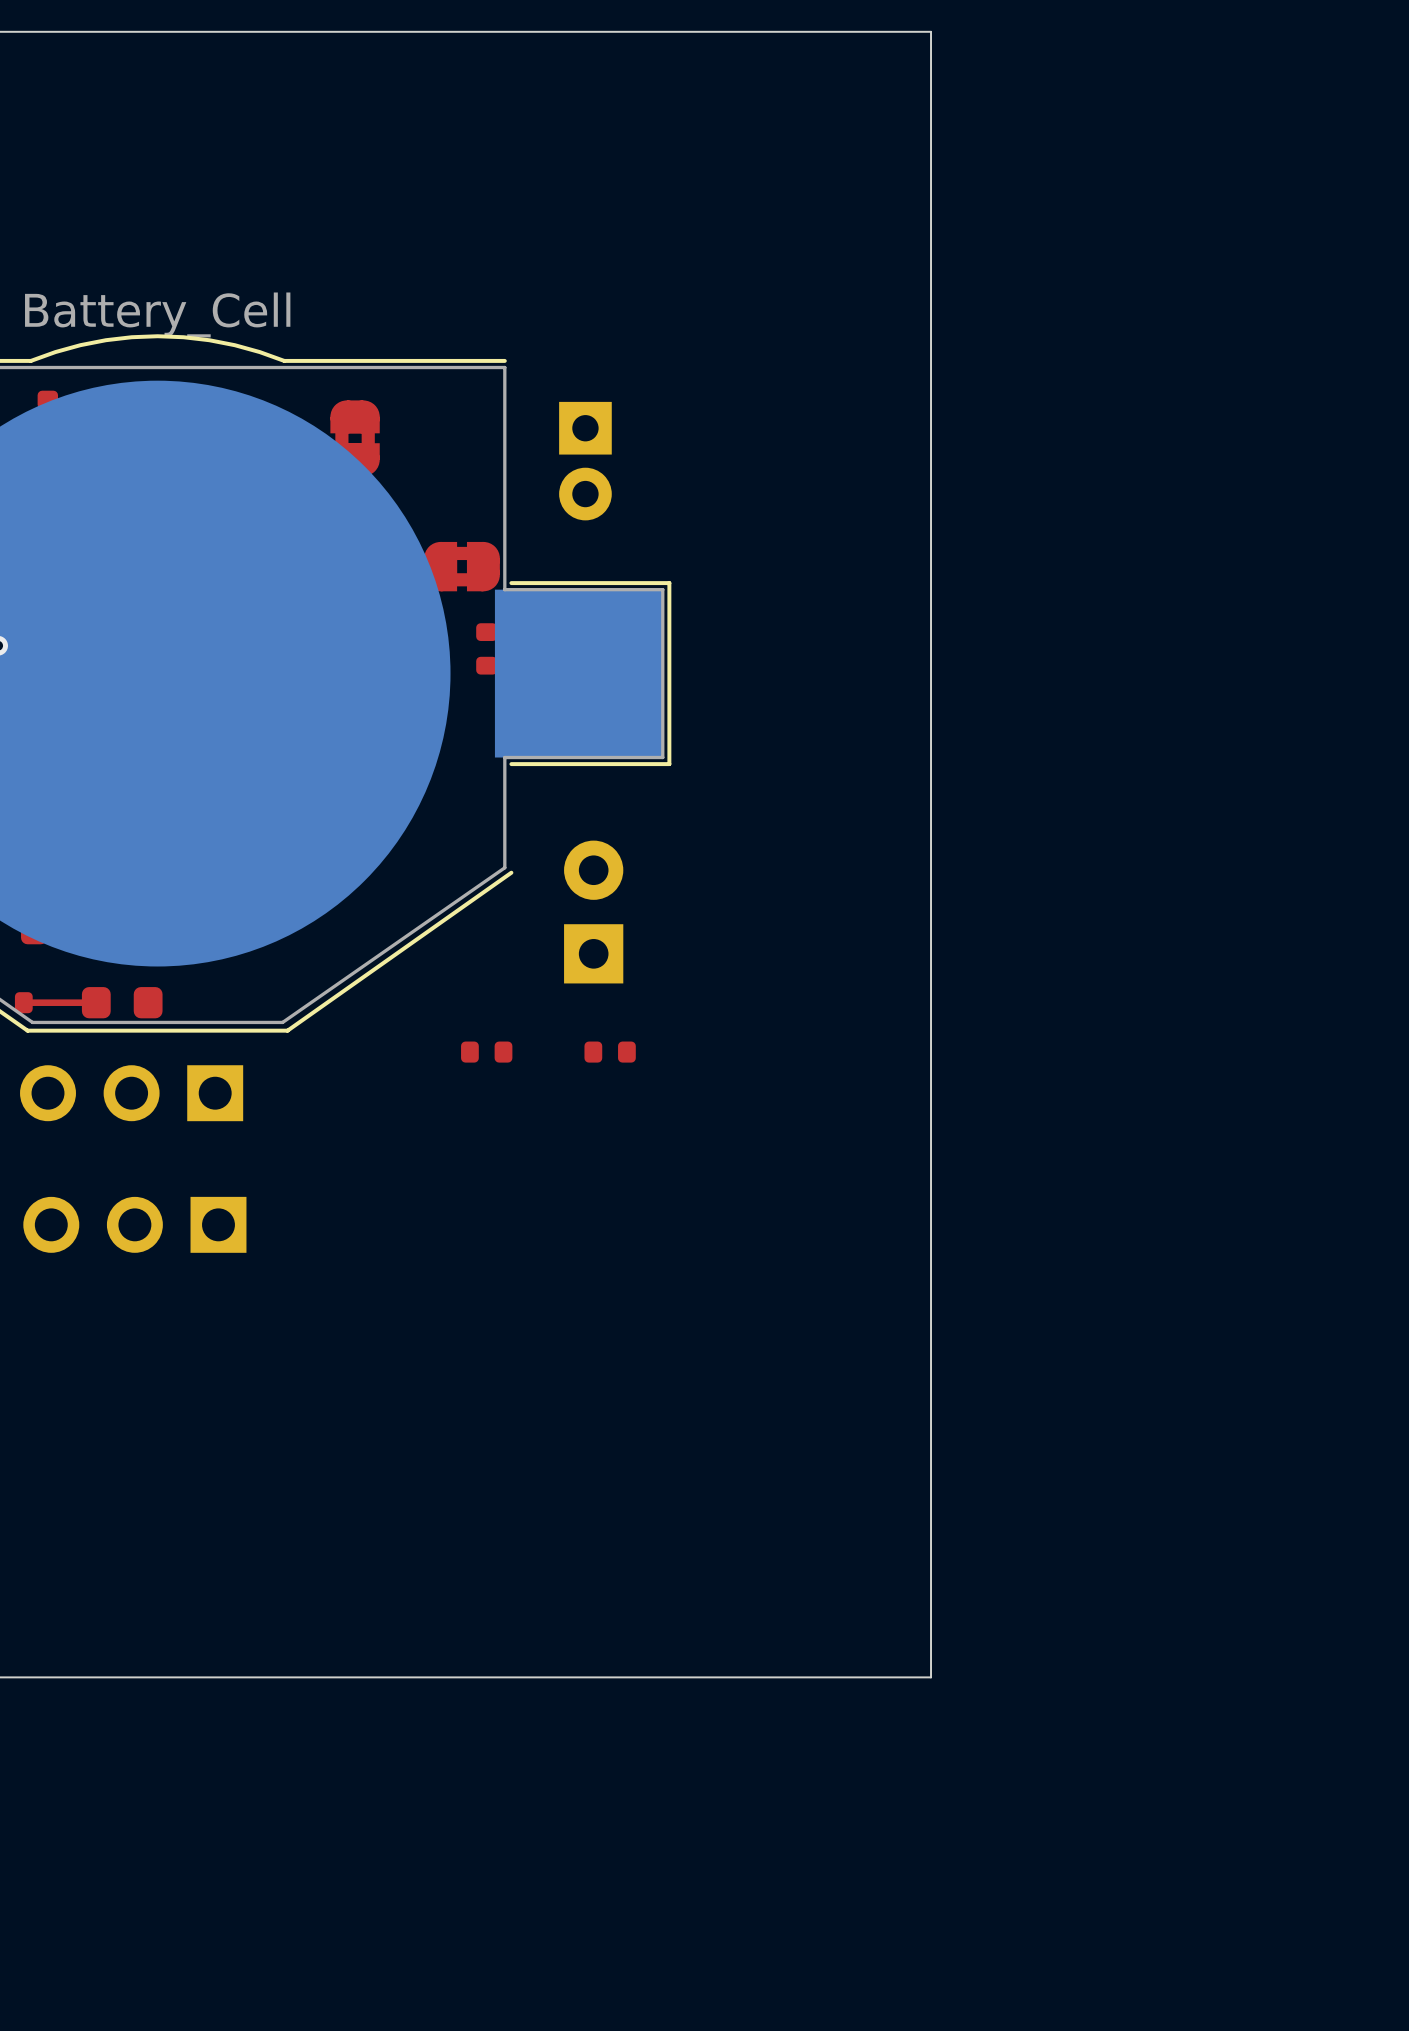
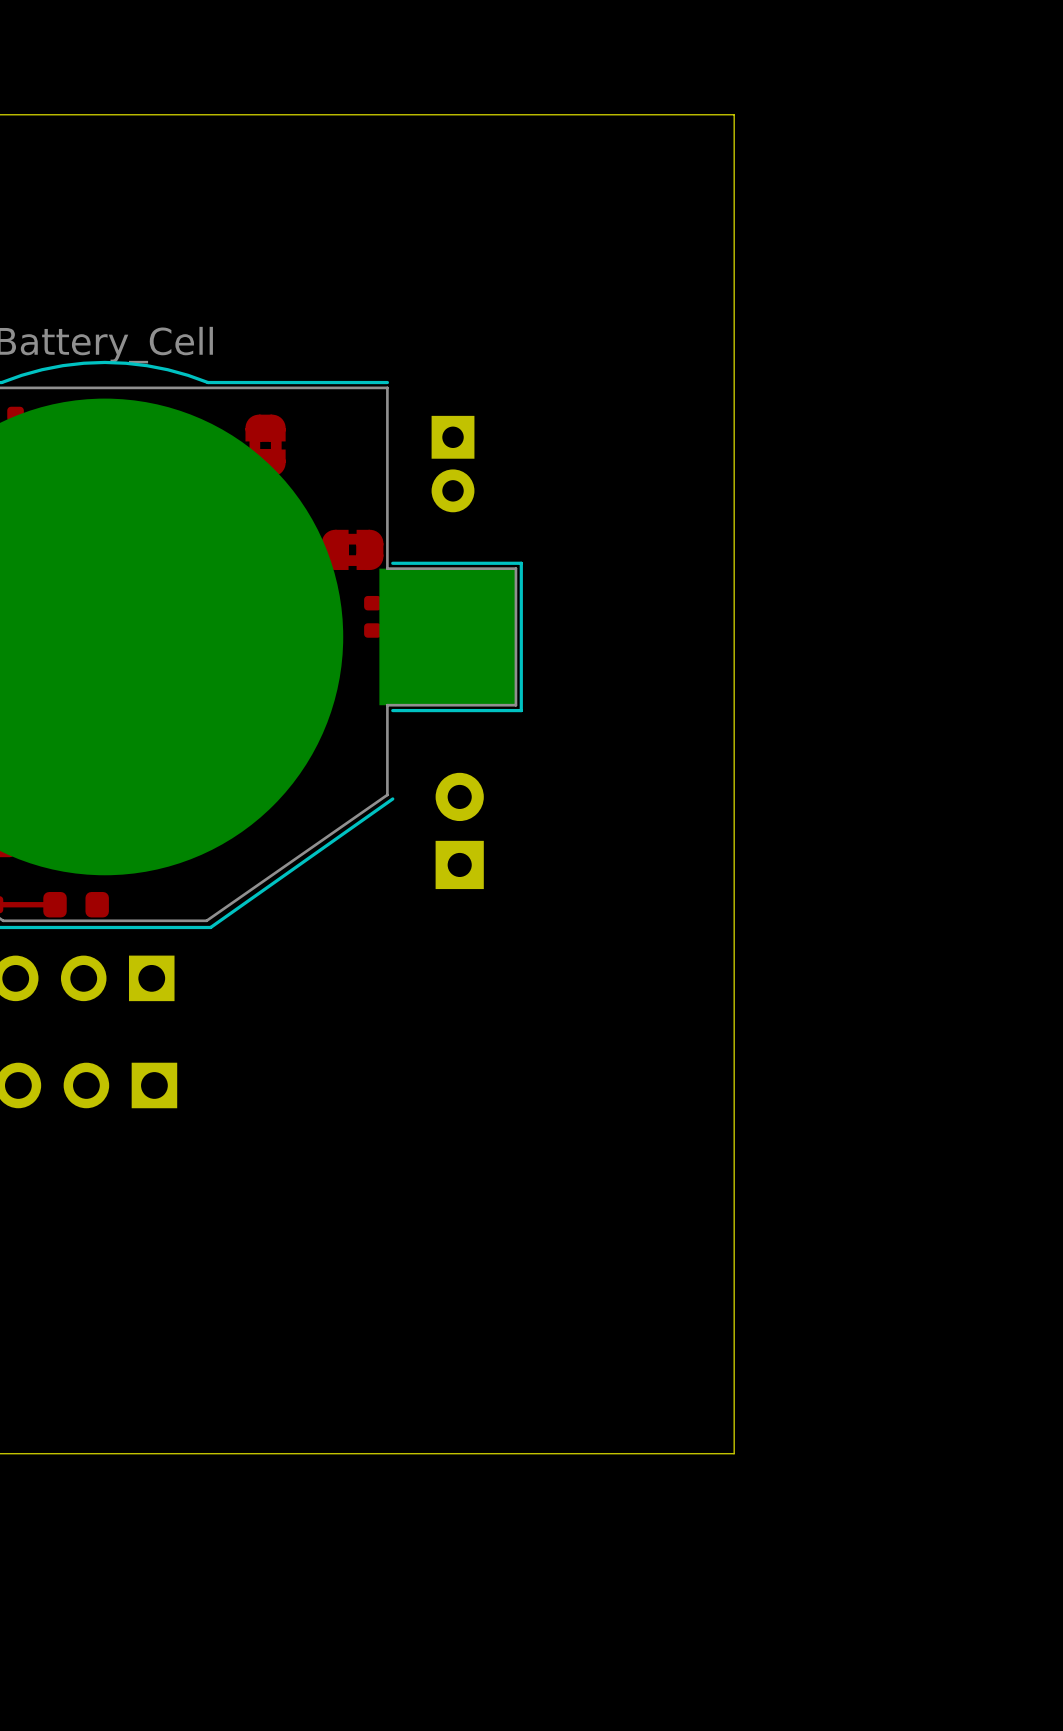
part: (486, 1052) -> none
part: (610, 1052) -> none

